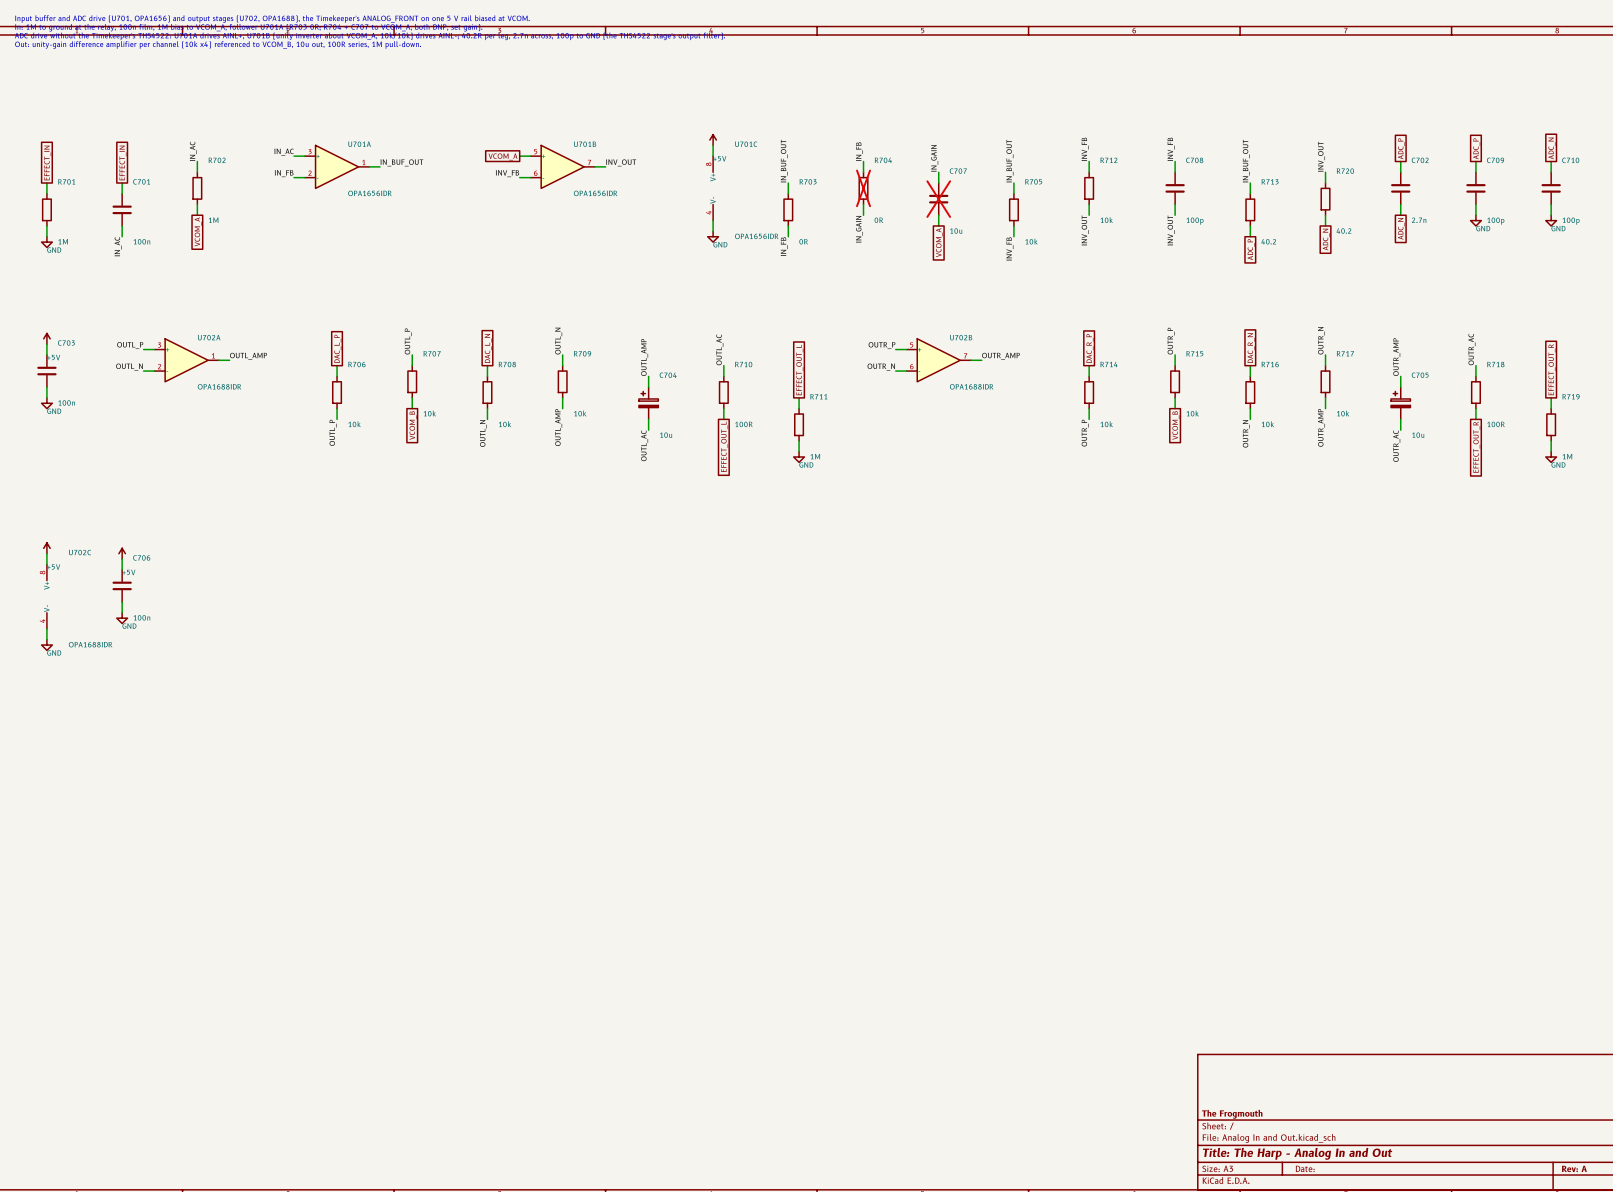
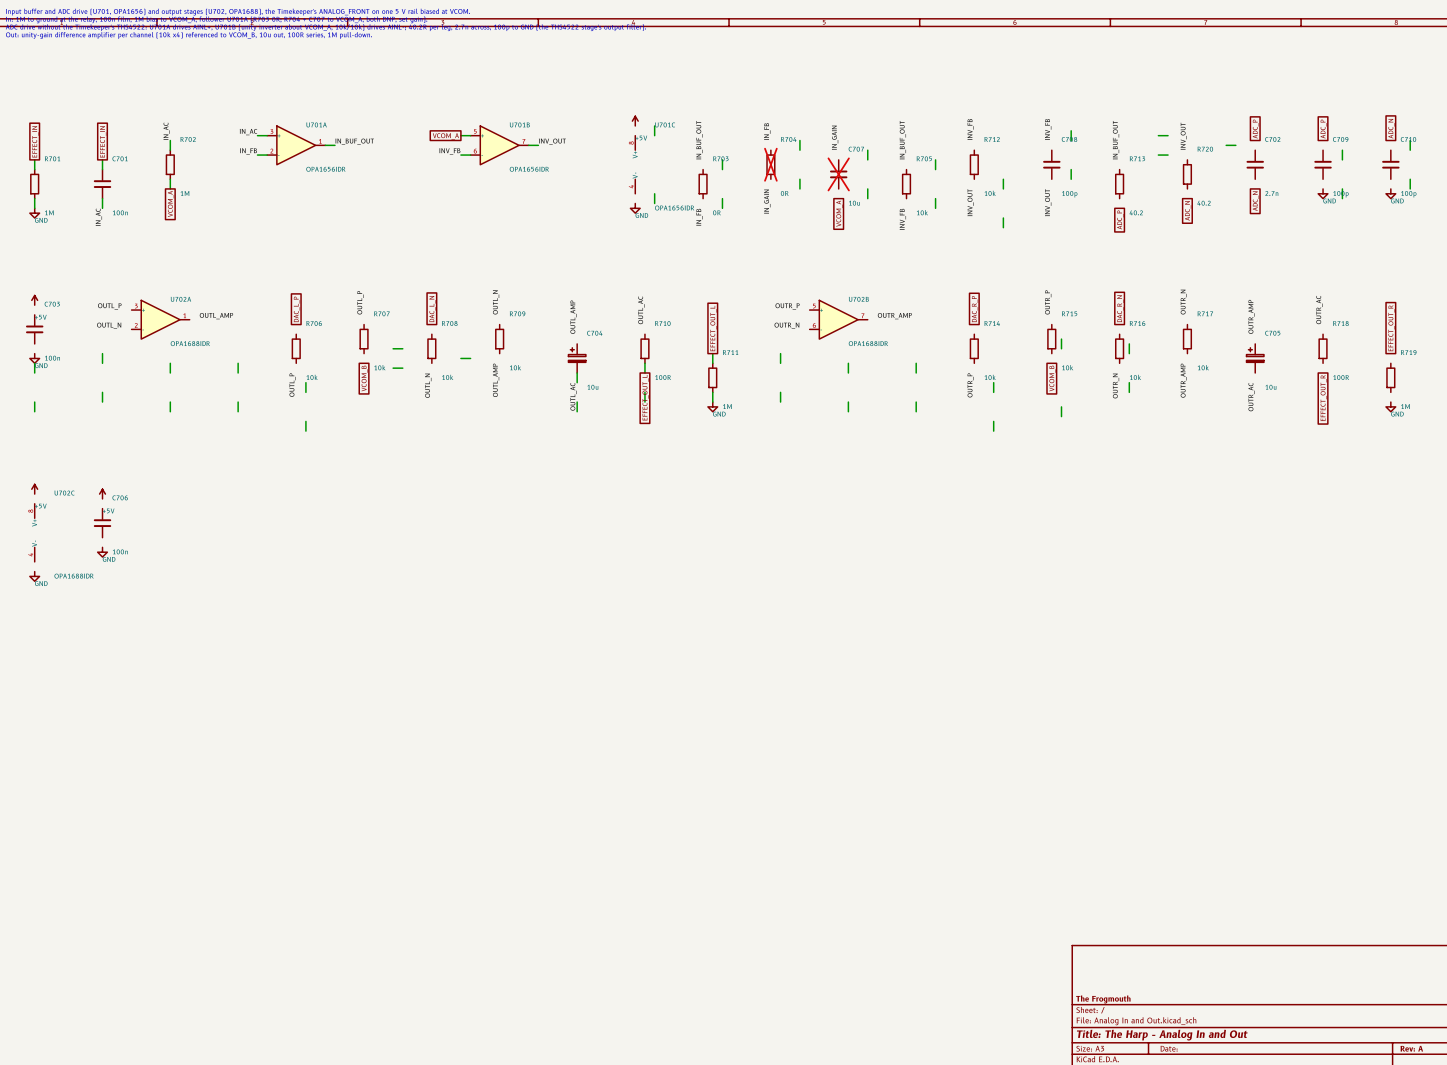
wire: (713, 145) (713, 156) -> (654, 125) (654, 135)
wire: none -> (1158, 135) (1168, 135)
wire: (863, 161) (863, 172) -> (799, 140) (799, 150)
wire: (1089, 161) (1089, 172) -> none
wire: (1175, 161) (1175, 172) -> (1071, 130) (1071, 140)
wire: (1400, 161) (1400, 172) -> none
wire: (1475, 161) (1475, 172) -> (1342, 150) (1342, 159)
wire: (1551, 161) (1551, 172) -> (1410, 140) (1410, 150)
wire: none -> (1226, 145) (1235, 145)
wire: (938, 172) (938, 183) -> (867, 150) (867, 159)
wire: (1325, 172) (1325, 183) -> none
wire: none -> (1158, 155) (1168, 155)
wire: (788, 183) (788, 193) -> (722, 159) (722, 169)
wire: (1013, 183) (1013, 193) -> (935, 159) (935, 169)
wire: (1250, 183) (1250, 193) -> (1071, 169) (1071, 179)
wire: (863, 204) (863, 215) -> (799, 179) (799, 188)
wire: (1089, 204) (1089, 215) -> (1003, 179) (1003, 188)
wire: (1175, 204) (1175, 215) -> (1003, 218) (1003, 227)
wire: (1400, 204) (1400, 215) -> none
wire: (1475, 204) (1475, 215) -> (1342, 188) (1342, 198)
wire: (1551, 204) (1551, 215) -> (1410, 179) (1410, 188)
wire: (938, 215) (938, 225) -> (867, 188) (867, 198)
wire: (1325, 215) (1325, 225) -> none
wire: (713, 220) (713, 231) -> (654, 193) (654, 203)
wire: (788, 225) (788, 236) -> (722, 198) (722, 208)
wire: (1013, 225) (1013, 236) -> (935, 198) (935, 208)
wire: (1250, 225) (1250, 236) -> none
wire: (46, 344) (46, 354) -> (34, 363) (34, 372)
wire: (143, 349) (154, 349) -> none
wire: (895, 349) (906, 349) -> none
wire: (412, 354) (412, 365) -> (305, 382) (305, 392)
wire: (562, 354) (562, 365) -> none
wire: (1175, 354) (1175, 365) -> (993, 382) (993, 392)
wire: (1325, 354) (1325, 365) -> (1129, 382) (1129, 392)
wire: (218, 360) (229, 360) -> none
wire: (970, 360) (981, 360) -> none
wire: (337, 365) (337, 376) -> (238, 363) (238, 372)
wire: (487, 365) (487, 376) -> none
wire: (723, 365) (723, 376) -> (644, 392) (644, 402)
wire: (1089, 365) (1089, 376) -> (916, 363) (916, 372)
wire: (1250, 365) (1250, 376) -> (1129, 343) (1129, 353)
wire: (1475, 365) (1475, 376) -> none
wire: (143, 371) (154, 371) -> none
wire: (895, 371) (906, 371) -> none
wire: (648, 376) (648, 387) -> (577, 402) (577, 411)
wire: (1400, 376) (1400, 387) -> none
wire: (46, 387) (46, 397) -> (34, 402) (34, 411)
wire: none -> (393, 348) (402, 348)
wire: none -> (102, 353) (102, 363)
wire: (412, 397) (412, 408) -> (305, 421) (305, 431)
wire: (562, 397) (562, 408) -> none
wire: none -> (780, 353) (780, 363)
wire: (1175, 397) (1175, 408) -> (993, 421) (993, 431)
wire: (1325, 397) (1325, 408) -> none
wire: (1551, 397) (1551, 408) -> none
wire: none -> (460, 358) (470, 358)
wire: none -> (170, 363) (170, 372)
wire: (337, 408) (337, 419) -> (238, 402) (238, 411)
wire: (487, 408) (487, 419) -> none
wire: none -> (848, 363) (848, 372)
wire: (1089, 408) (1089, 419) -> (916, 402) (916, 411)
wire: (1250, 408) (1250, 419) -> (1061, 339) (1061, 348)
wire: (1475, 408) (1475, 419) -> none
wire: none -> (393, 368) (402, 368)
wire: (1400, 419) (1400, 430) -> none
wire: none -> (102, 392) (102, 402)
wire: none -> (780, 392) (780, 402)
wire: (1551, 440) (1551, 451) -> none
wire: none -> (170, 402) (170, 411)
wire: none -> (848, 402) (848, 411)
wire: none -> (1061, 406) (1061, 416)
wire: (46, 553) (46, 564) -> none
wire: (122, 559) (122, 569) -> none
wire: (122, 602) (122, 612) -> none
wire: (46, 628) (46, 639) -> none

